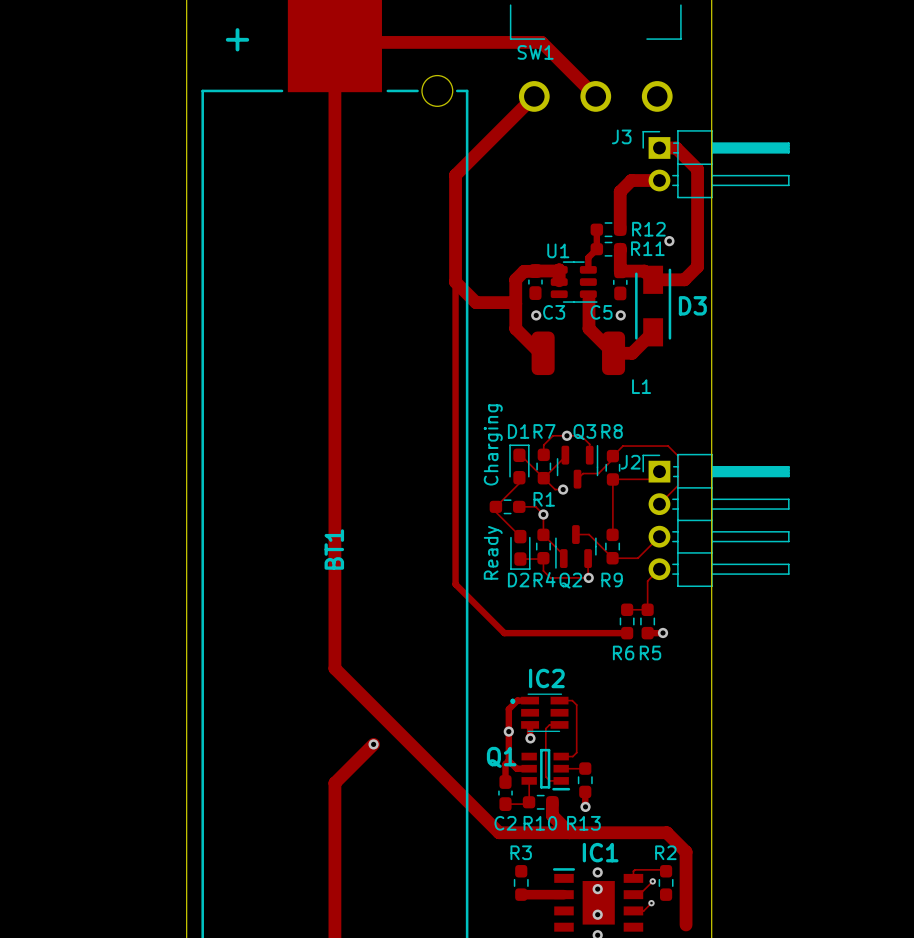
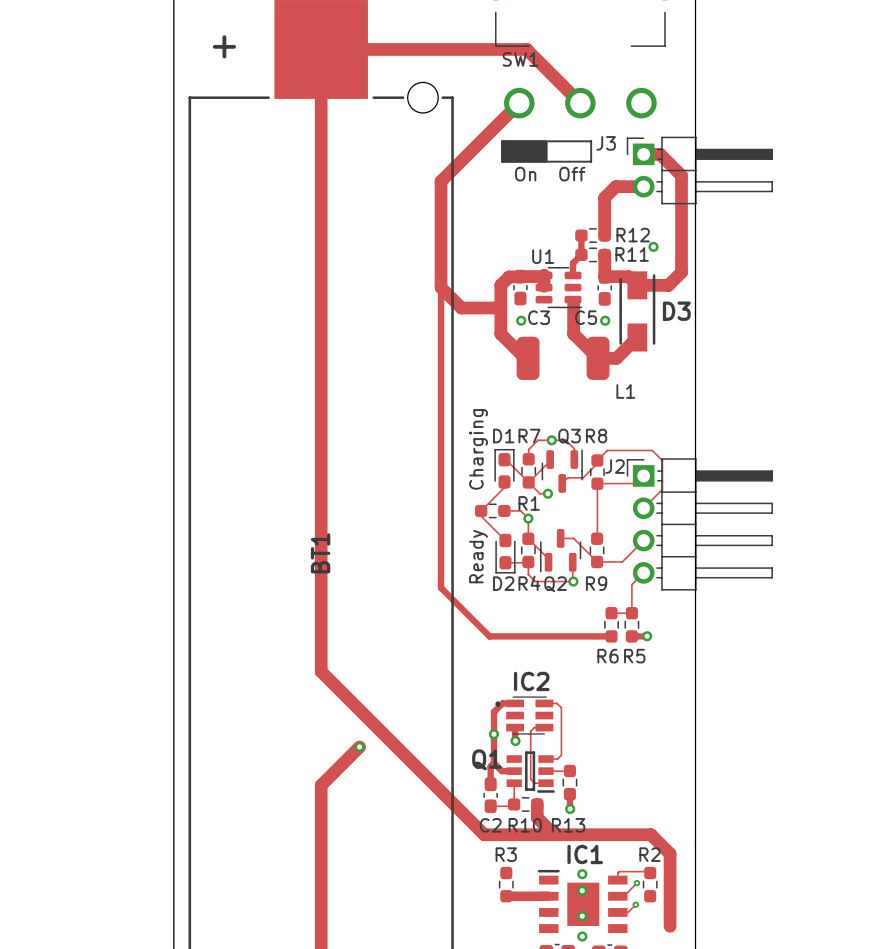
drawing: none -> [501, 140, 548, 163]
line: none -> (502, 141) (591, 141) (591, 161) (502, 161) (502, 141)
text: none -> On Off (550, 174)

